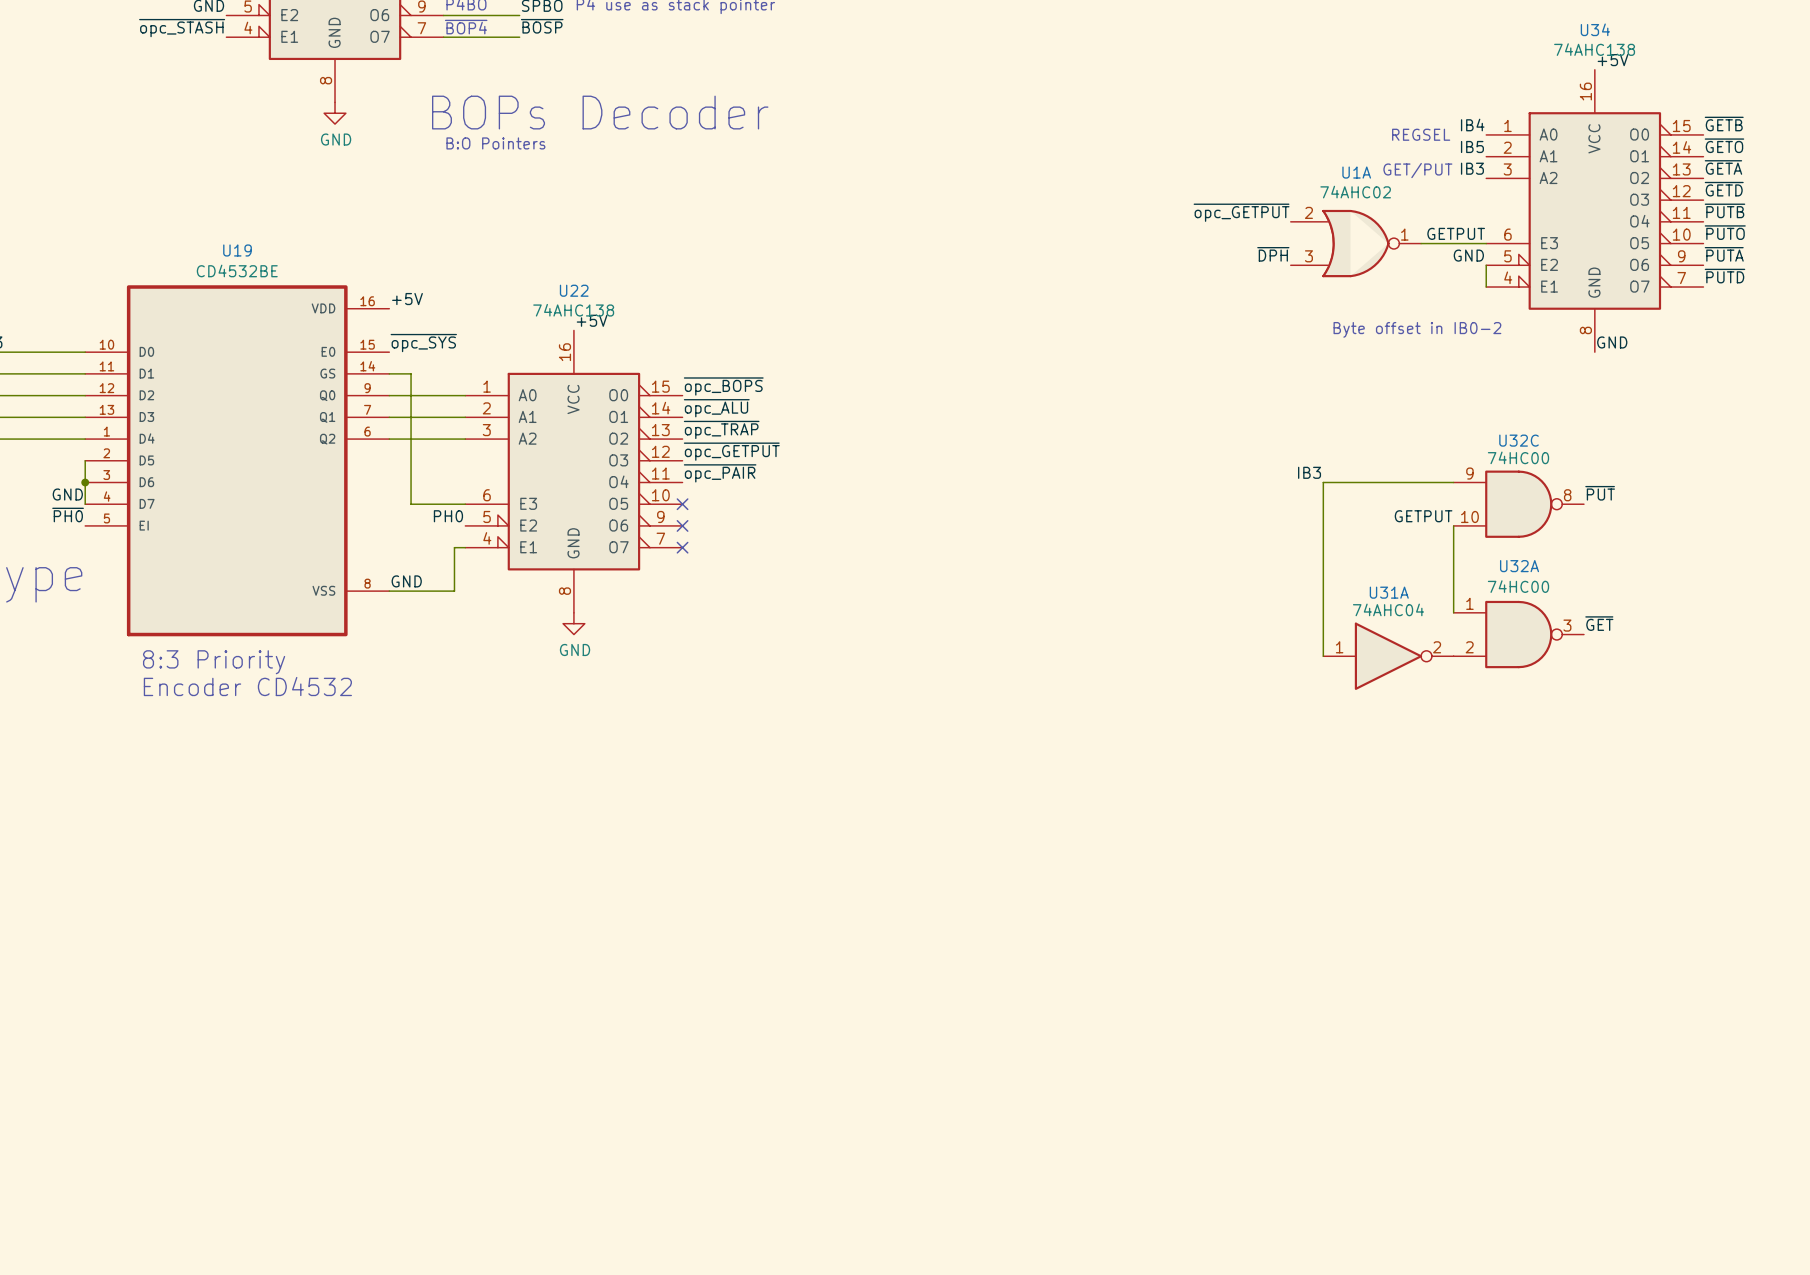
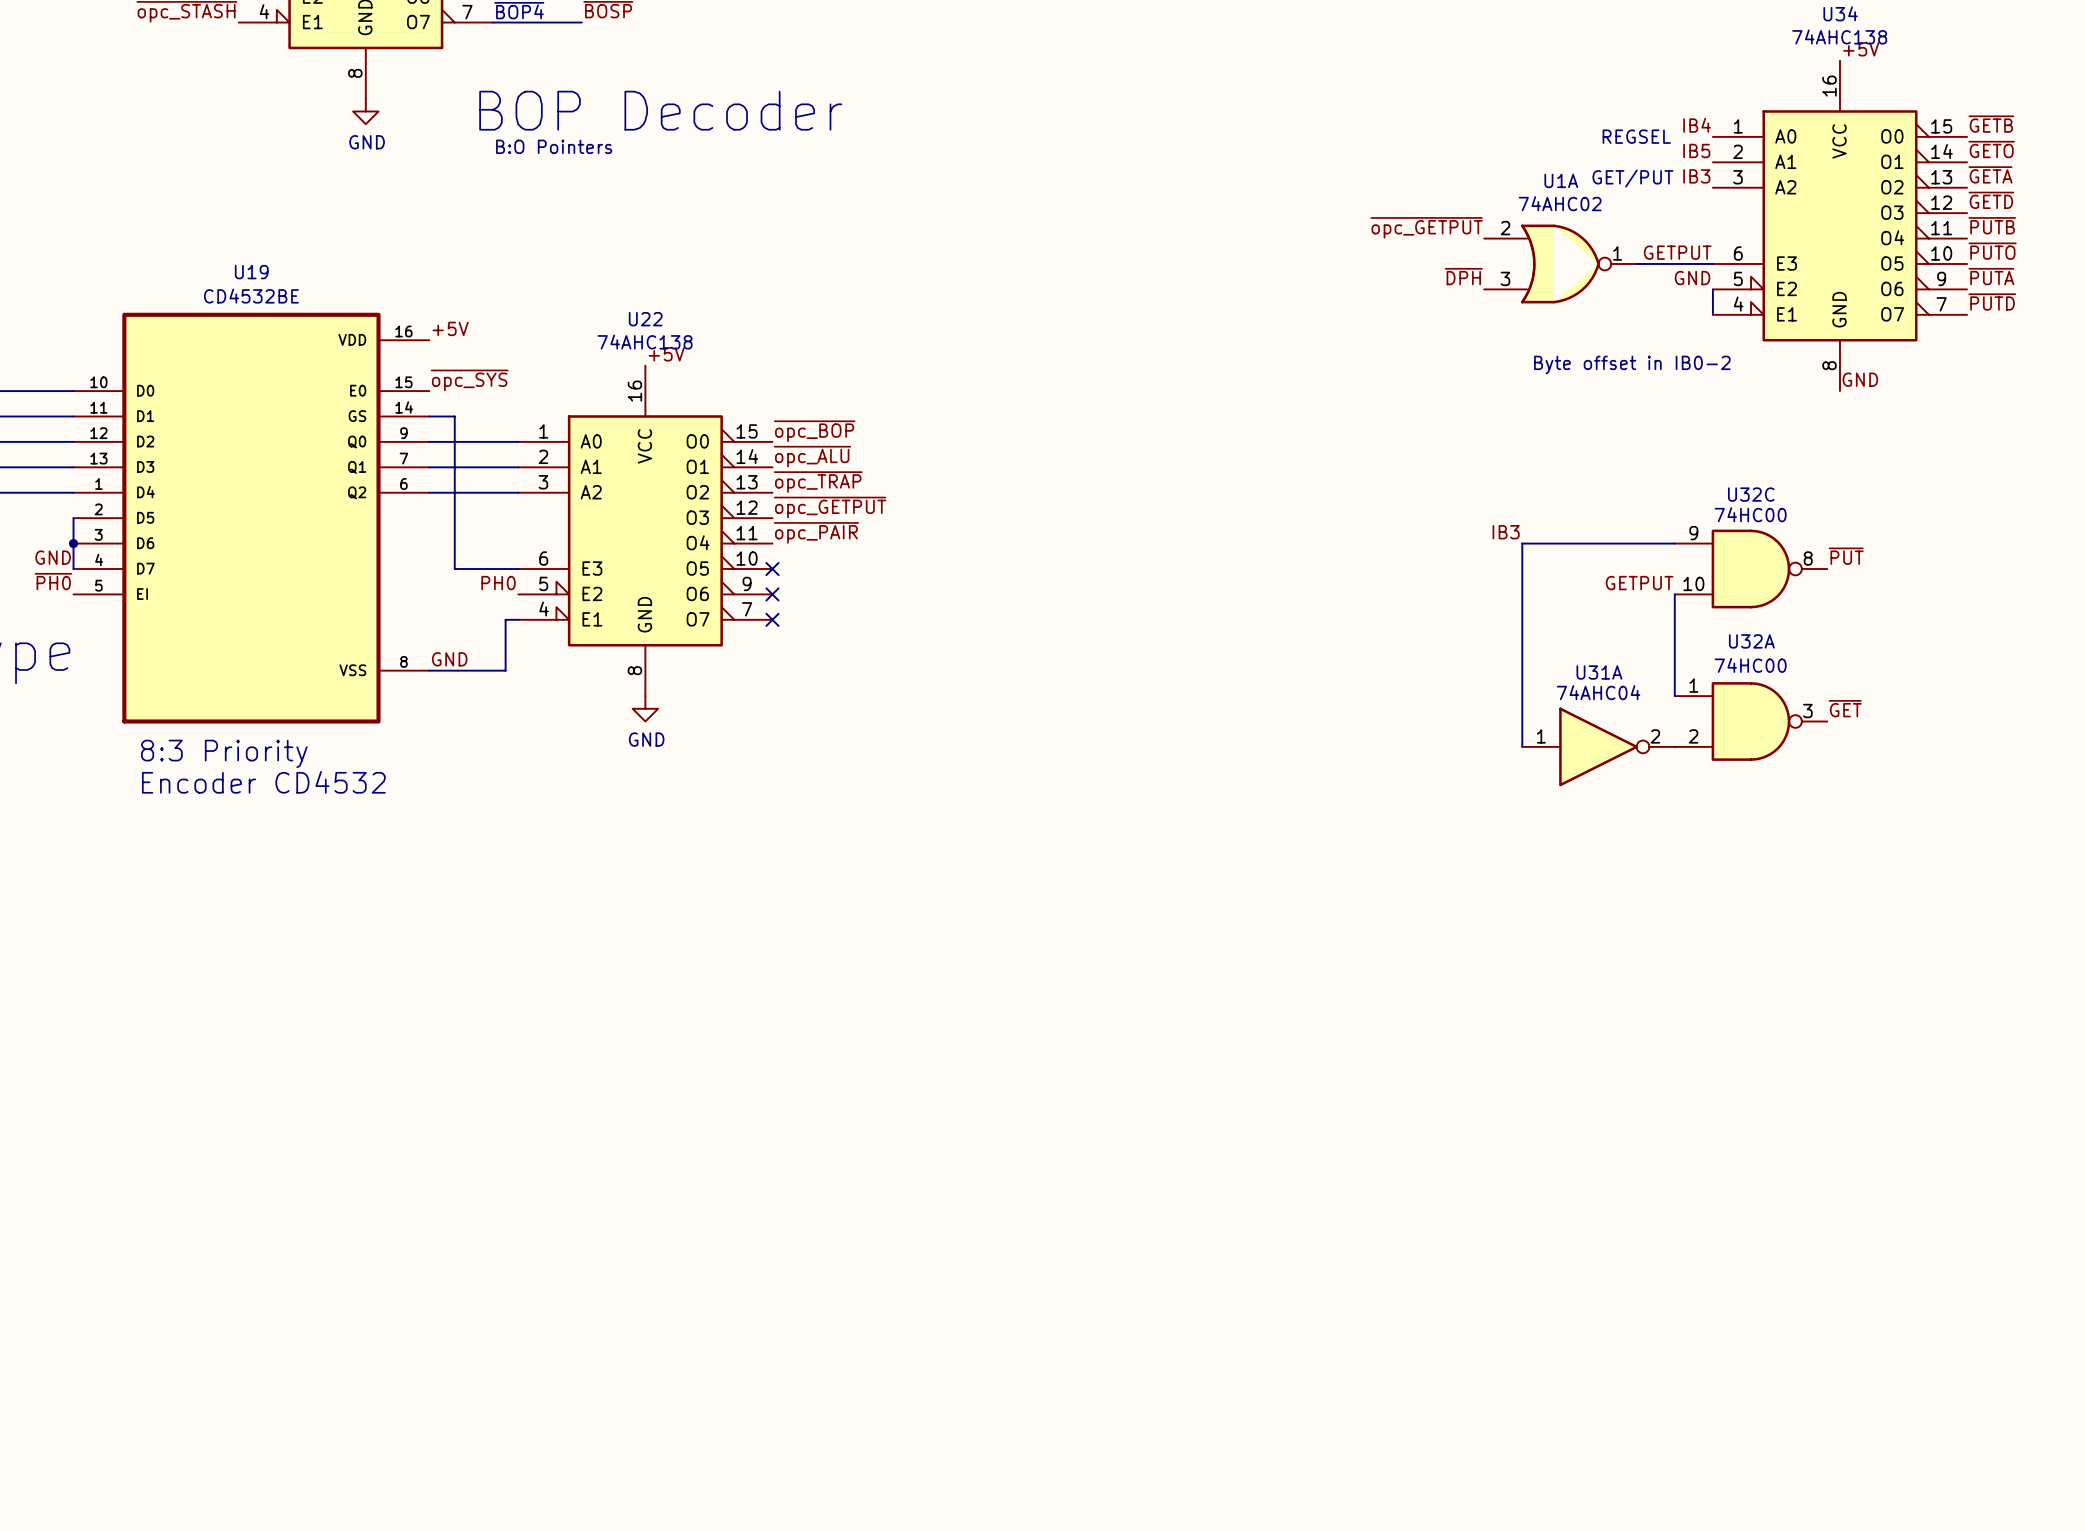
text: BOPs Decoder (600, 112) -> BOP Decoder (660, 110)
label: ~{opc_BOPS} (723, 386) -> ~{opc_BOP} (814, 431)

